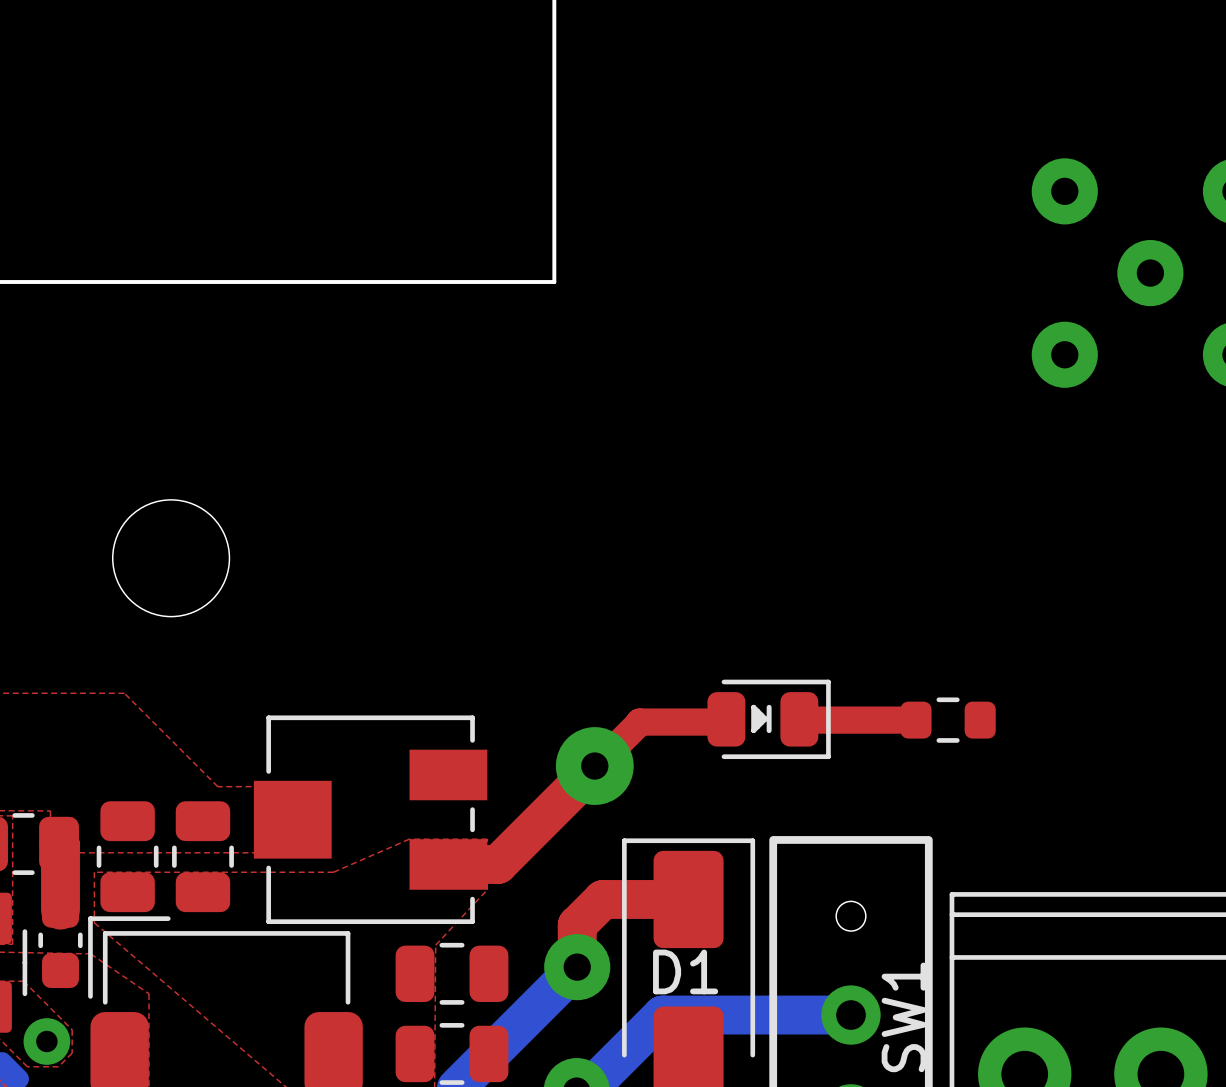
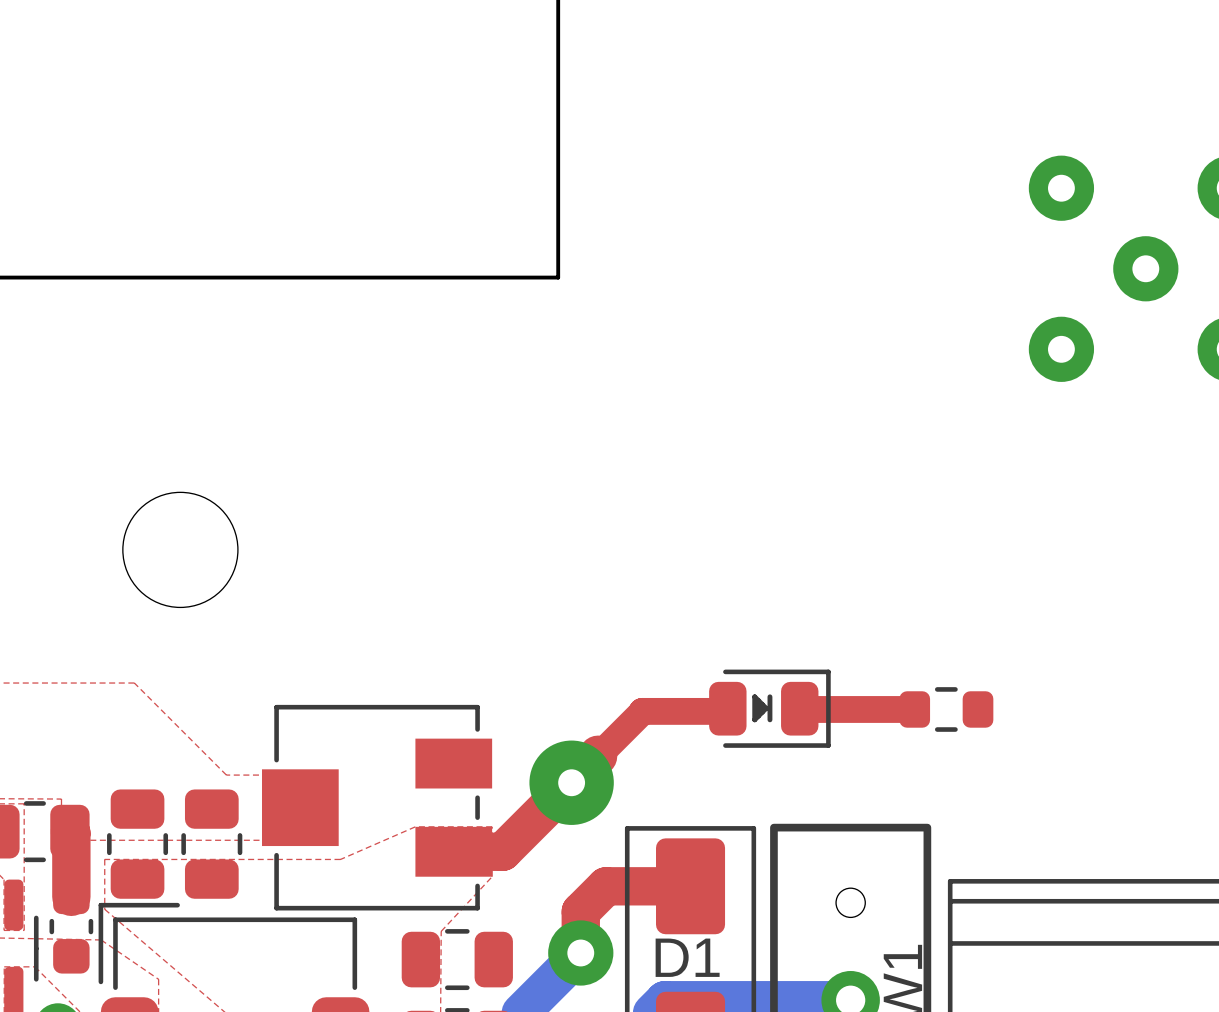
via: (594, 766) -> none
via: none -> (571, 782)

